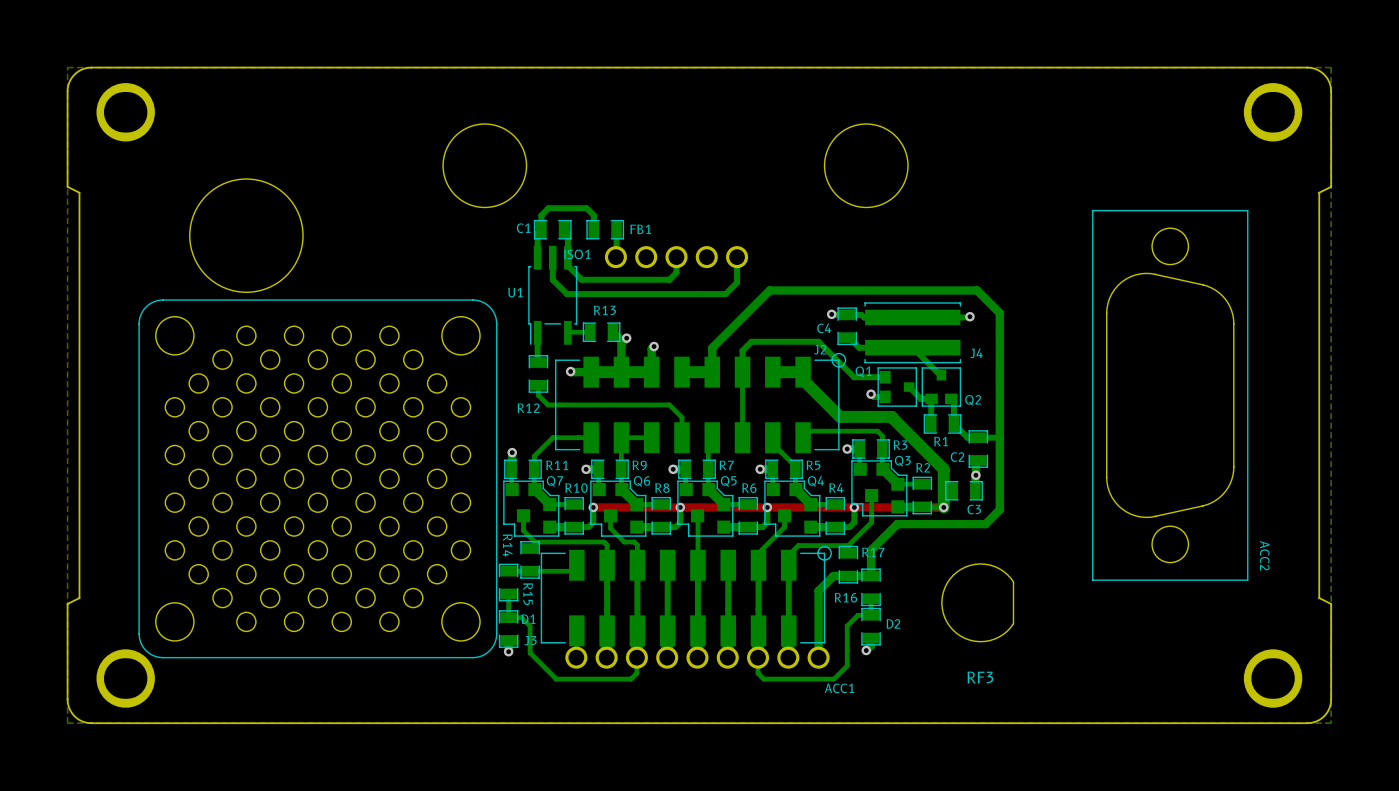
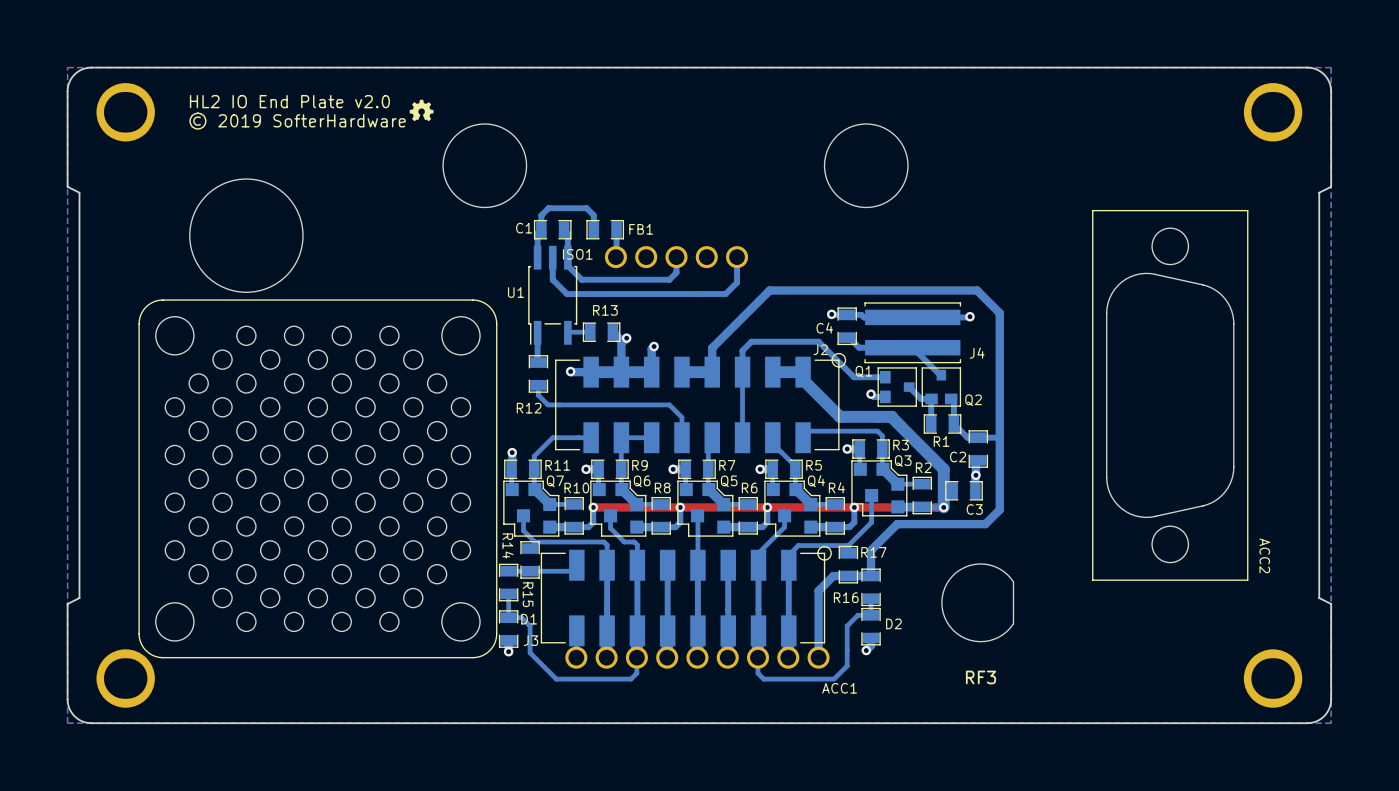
drawing: none -> [409, 99, 434, 122]
text: none -> HL2 IO End Plate v2.0 (289, 101)
text: none -> © 2019 SofterHardware (297, 121)

